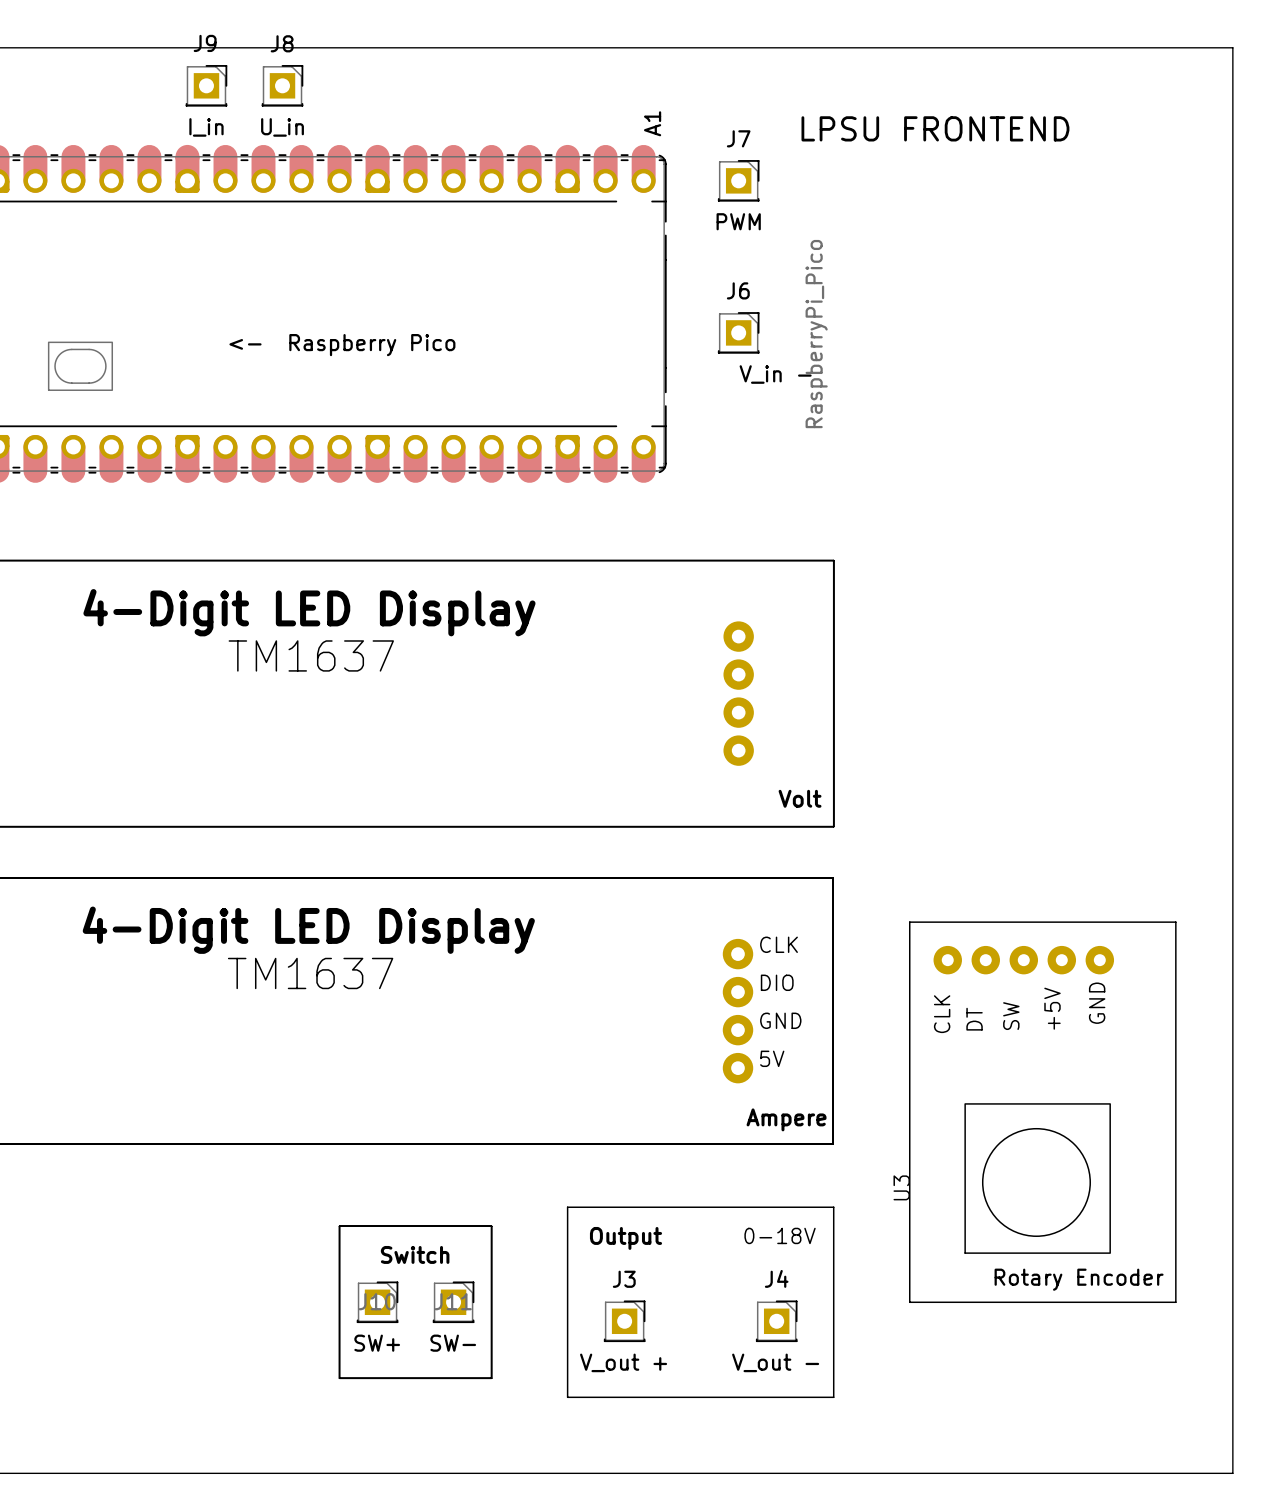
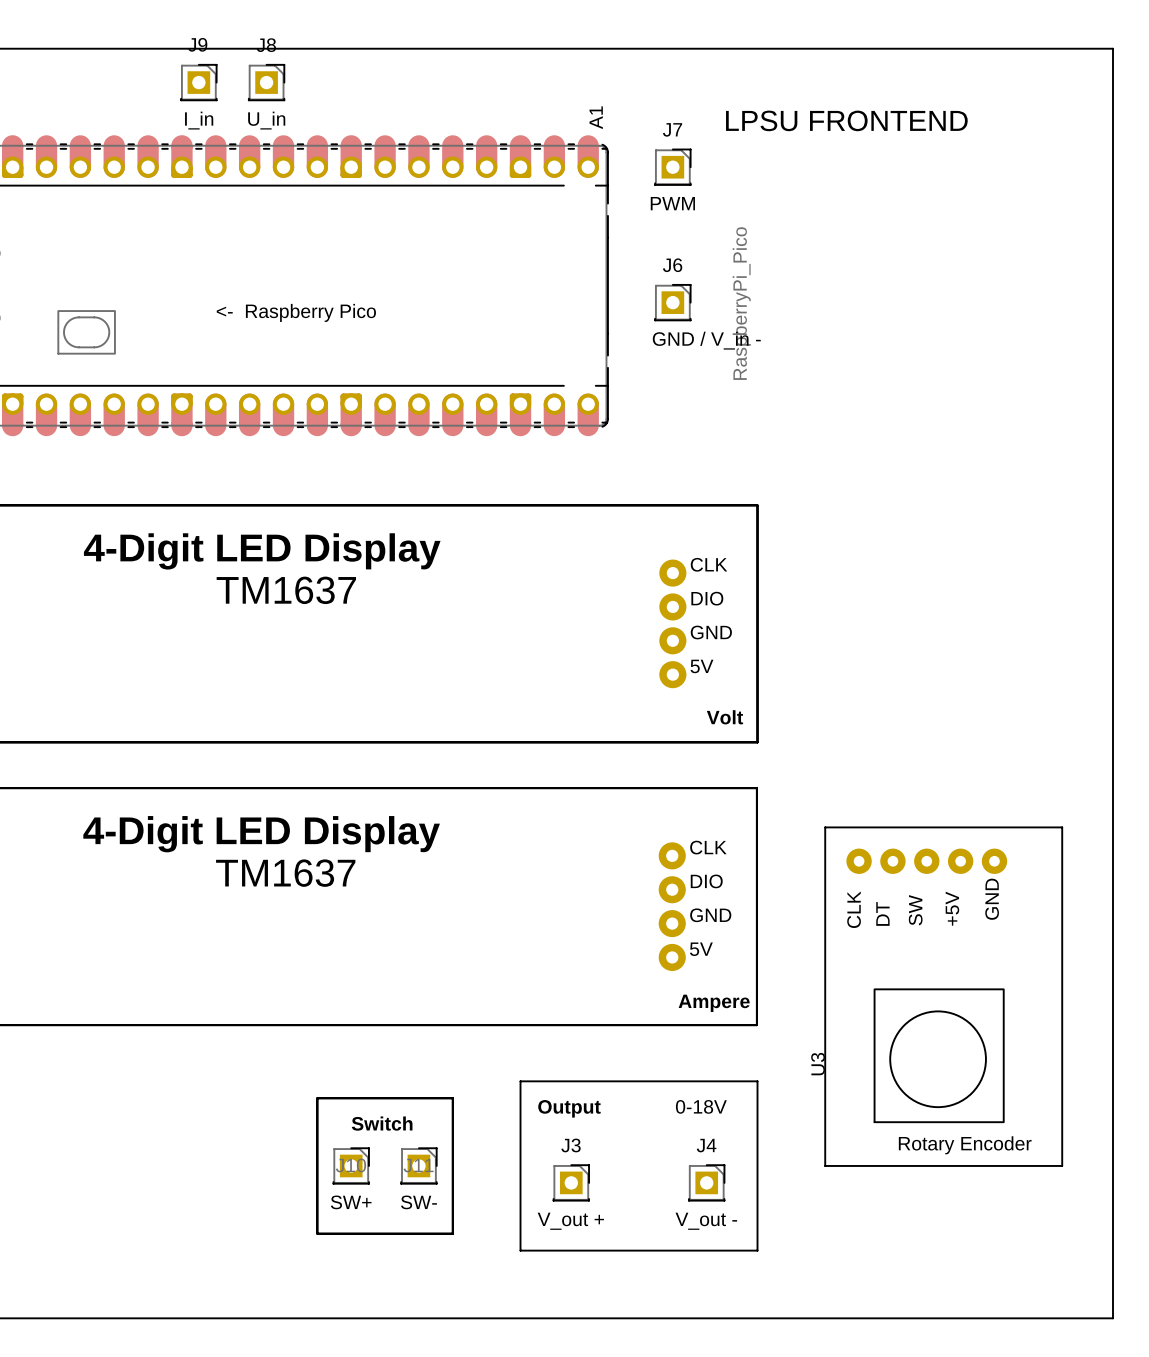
J6 value: V_in - (775, 374) -> GND / V_in - (706, 340)
part text: none -> CLK (709, 564)
part text: none -> DIO (707, 598)
part text: none -> GND (711, 632)
part text: none -> 5V (701, 666)

